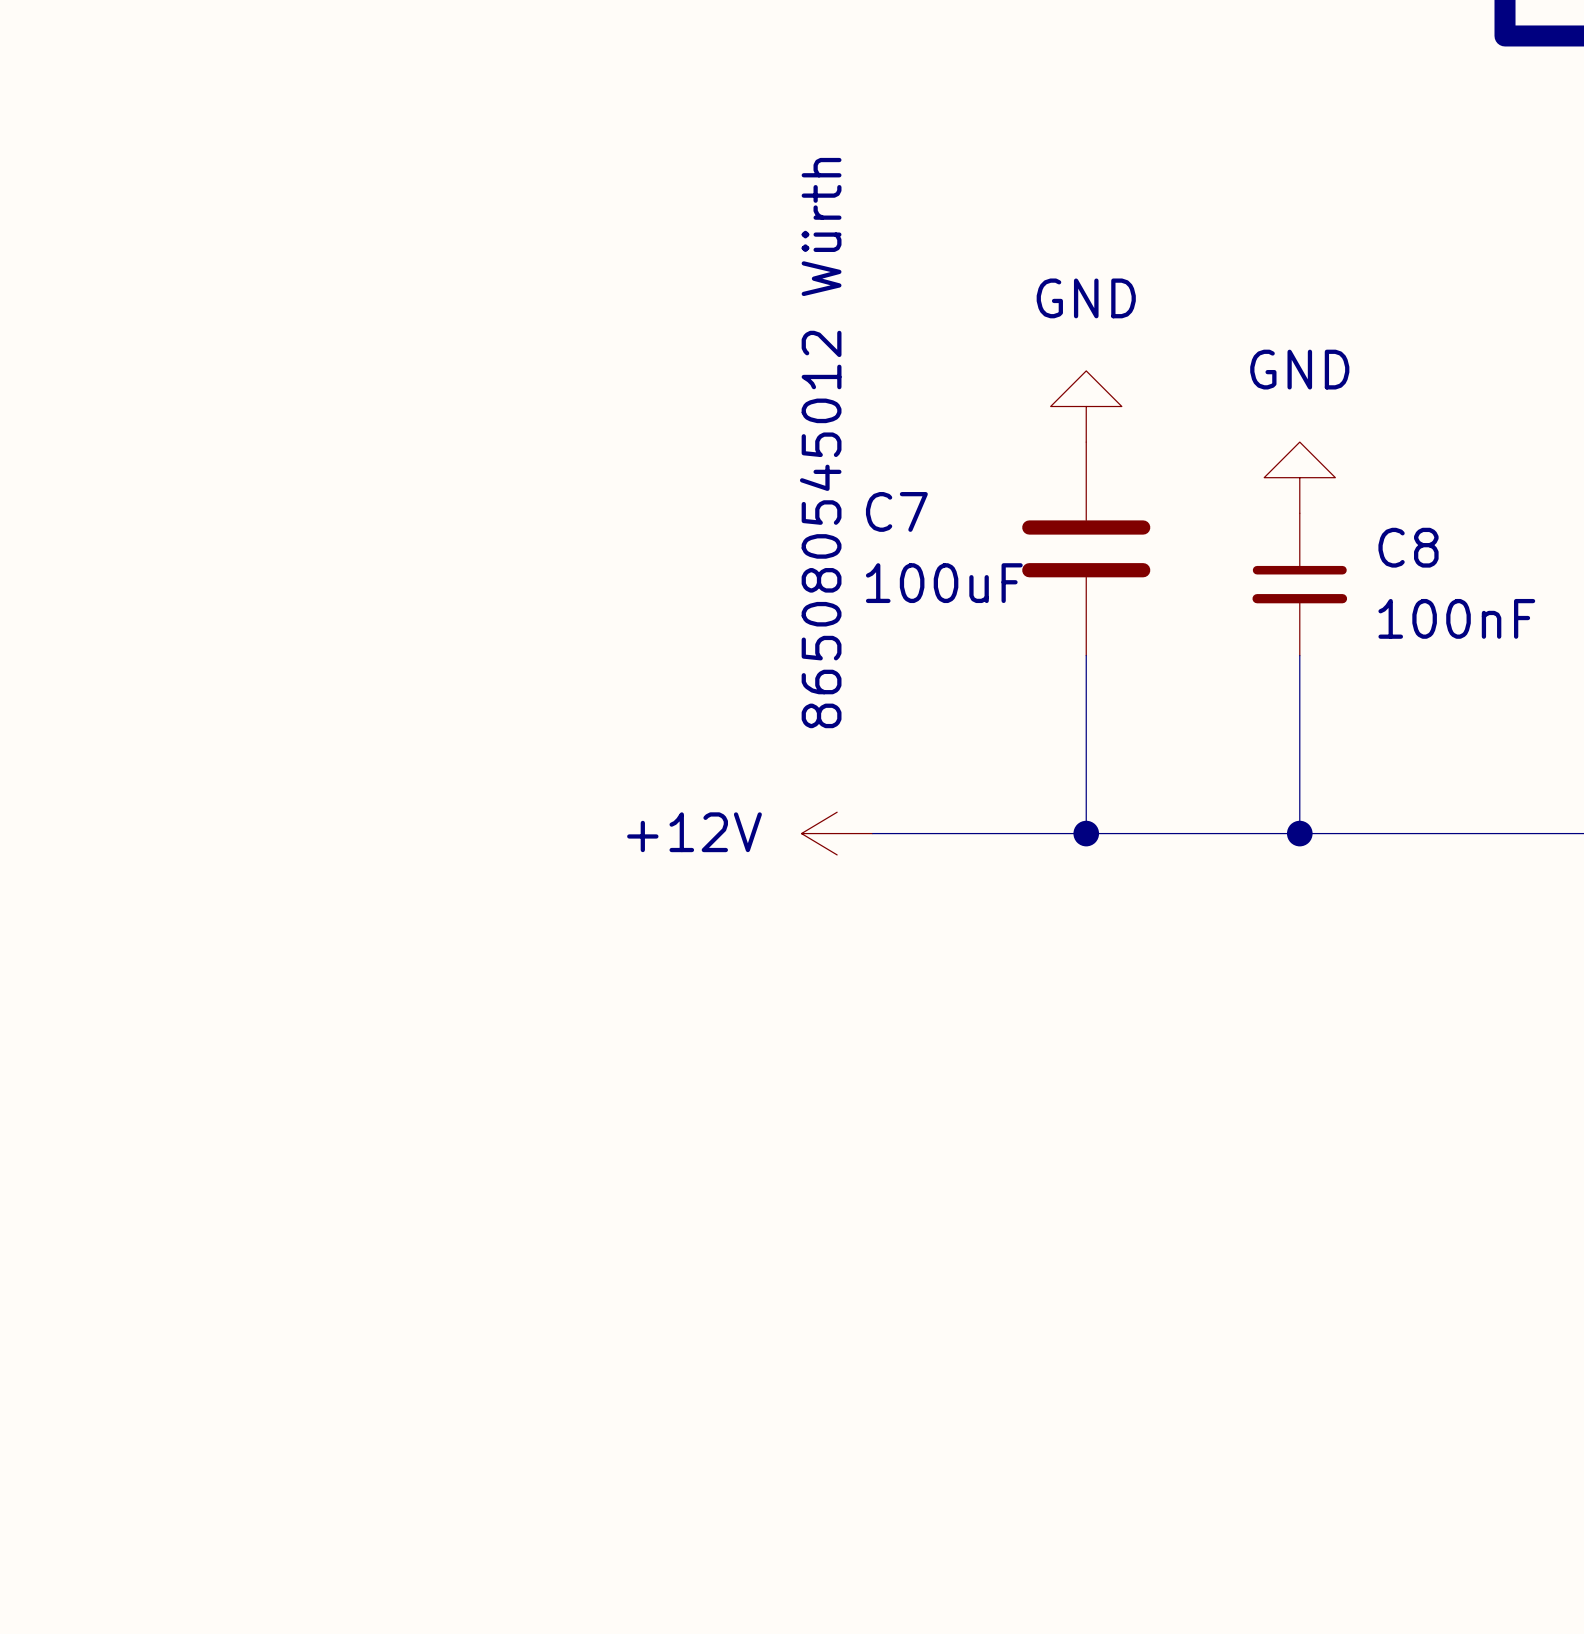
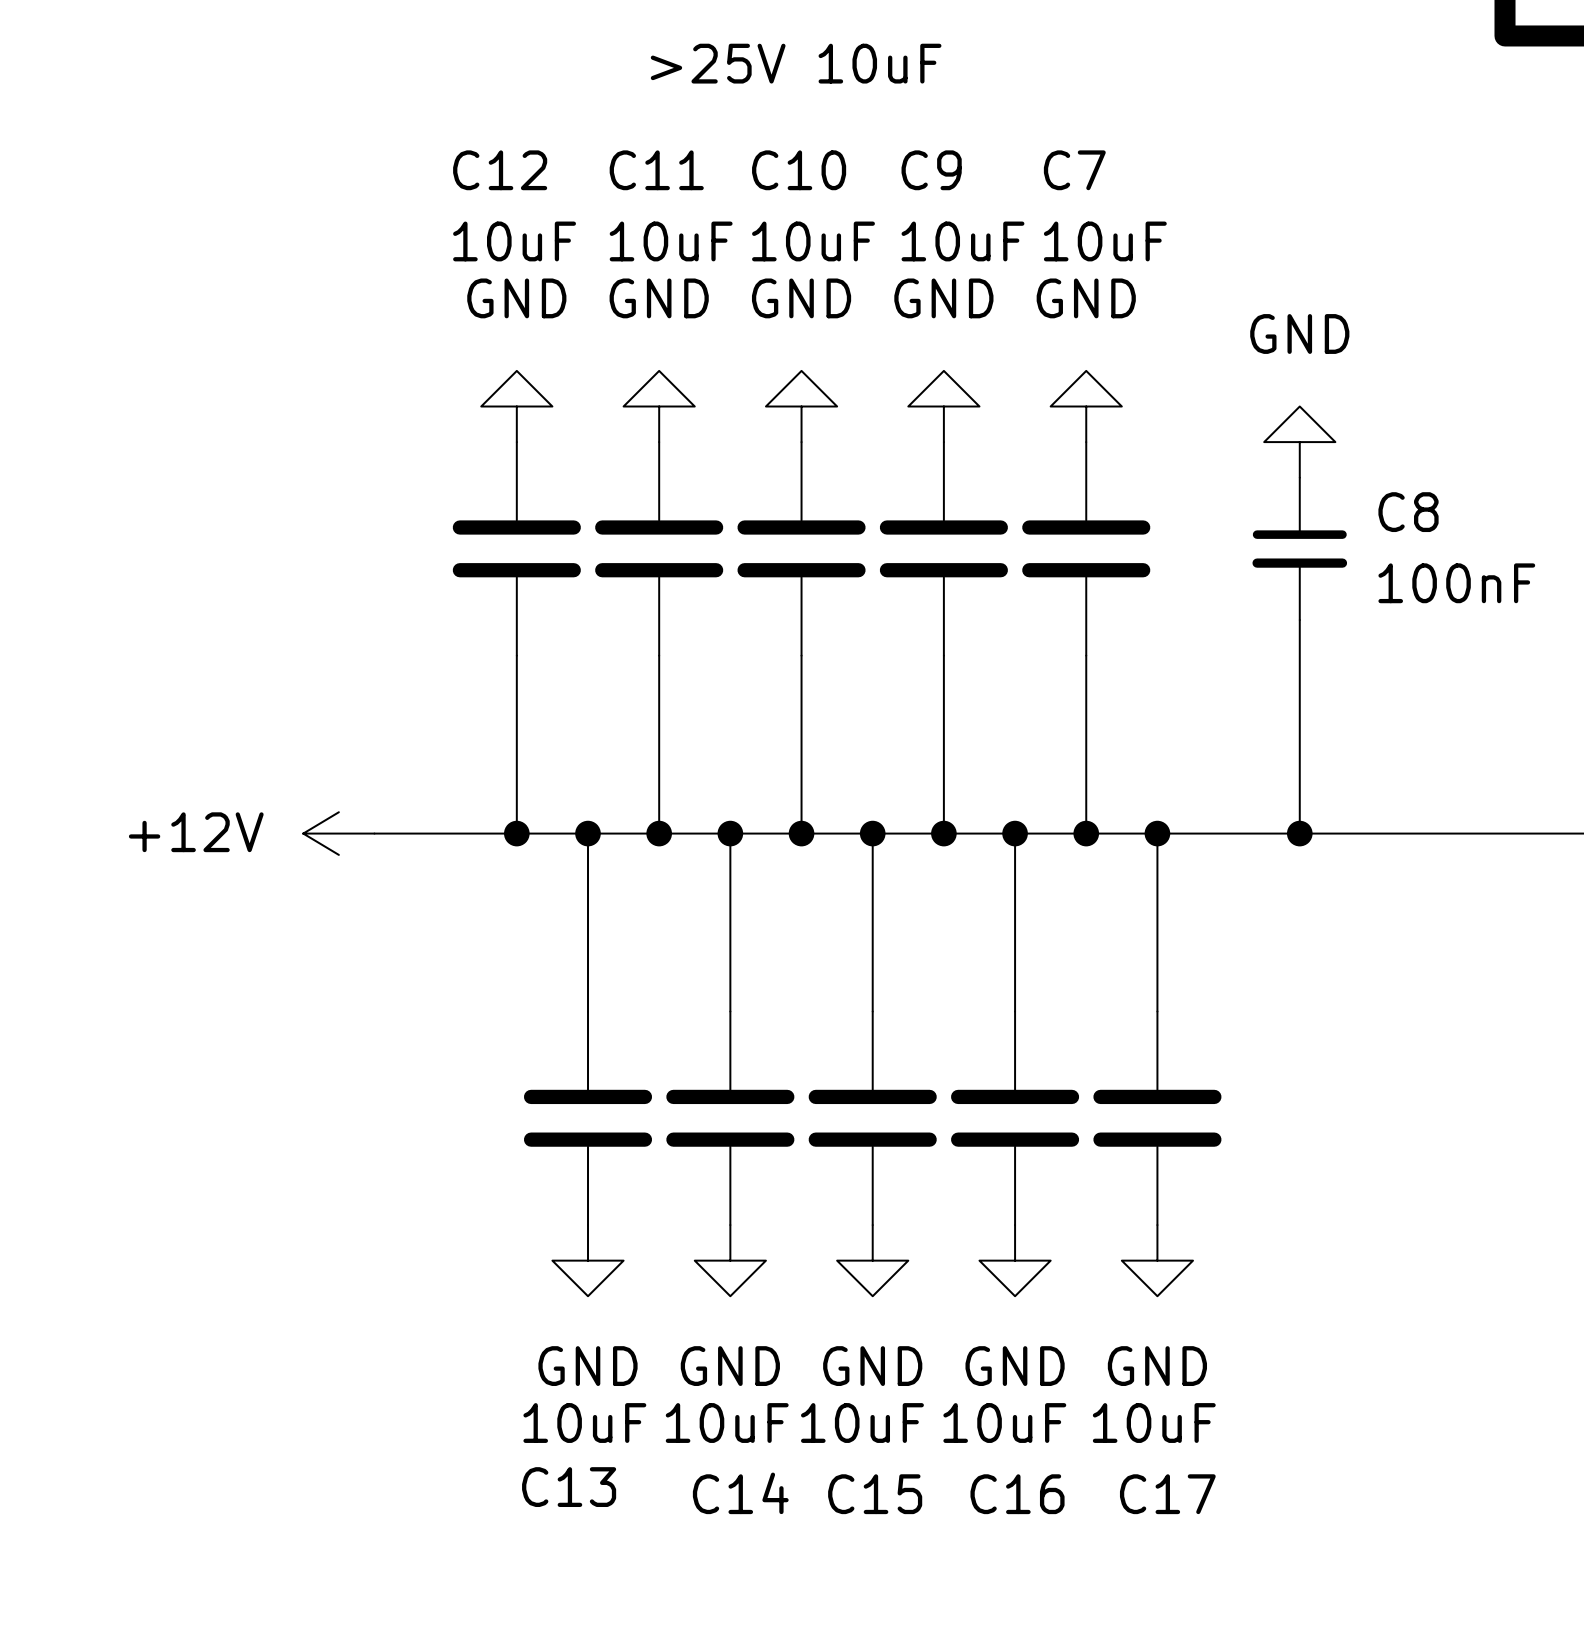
text: none -> >25V 10uF (796, 63)
power symbol: none -> GND (516, 406)
power symbol: none -> GND (659, 406)
power symbol: none -> GND (801, 406)
power symbol: none -> GND (943, 406)
text: 865080545012 Würth (820, 443) -> none
power symbol position: GND (1299, 477) -> GND (1299, 442)
C7 name position: C7 (896, 511) -> C7 (1074, 170)
C12: none -> 10uF (516, 548)
C11: none -> 10uF (659, 548)
C10: none -> 10uF (801, 548)
C9: none -> 10uF (943, 548)
C7 value: 100uF (944, 583) -> 10uF (1105, 241)
C8 position: (1299, 584) -> (1299, 548)
wire: none -> (516, 655) (516, 833)
wire: none -> (659, 655) (659, 833)
wire: none -> (801, 655) (801, 833)
wire: none -> (943, 655) (943, 833)
wire: none -> (374, 833) (872, 833) (872, 1011)
junction: none -> (516, 833)
wire: none -> (588, 833) (588, 1011)
junction: none -> (588, 833)
junction: none -> (659, 833)
wire: none -> (730, 833) (730, 1011)
junction: none -> (730, 833)
junction: none -> (801, 833)
power symbol position: +12V (837, 833) -> +12V (338, 833)
junction: none -> (872, 833)
junction: none -> (943, 833)
wire: none -> (1015, 833) (1015, 1011)
junction: none -> (1015, 833)
wire: none -> (1157, 833) (1157, 1011)
junction: none -> (1157, 833)
C13: none -> 10uF (588, 1118)
C14: none -> 10uF (730, 1118)
C15: none -> 10uF (872, 1118)
C16: none -> 10uF (1015, 1118)
C17: none -> 10uF (1157, 1118)
power symbol: none -> GND (588, 1260)
power symbol: none -> GND (730, 1260)
power symbol: none -> GND (872, 1260)
power symbol: none -> GND (1015, 1260)
power symbol: none -> GND (1157, 1260)

